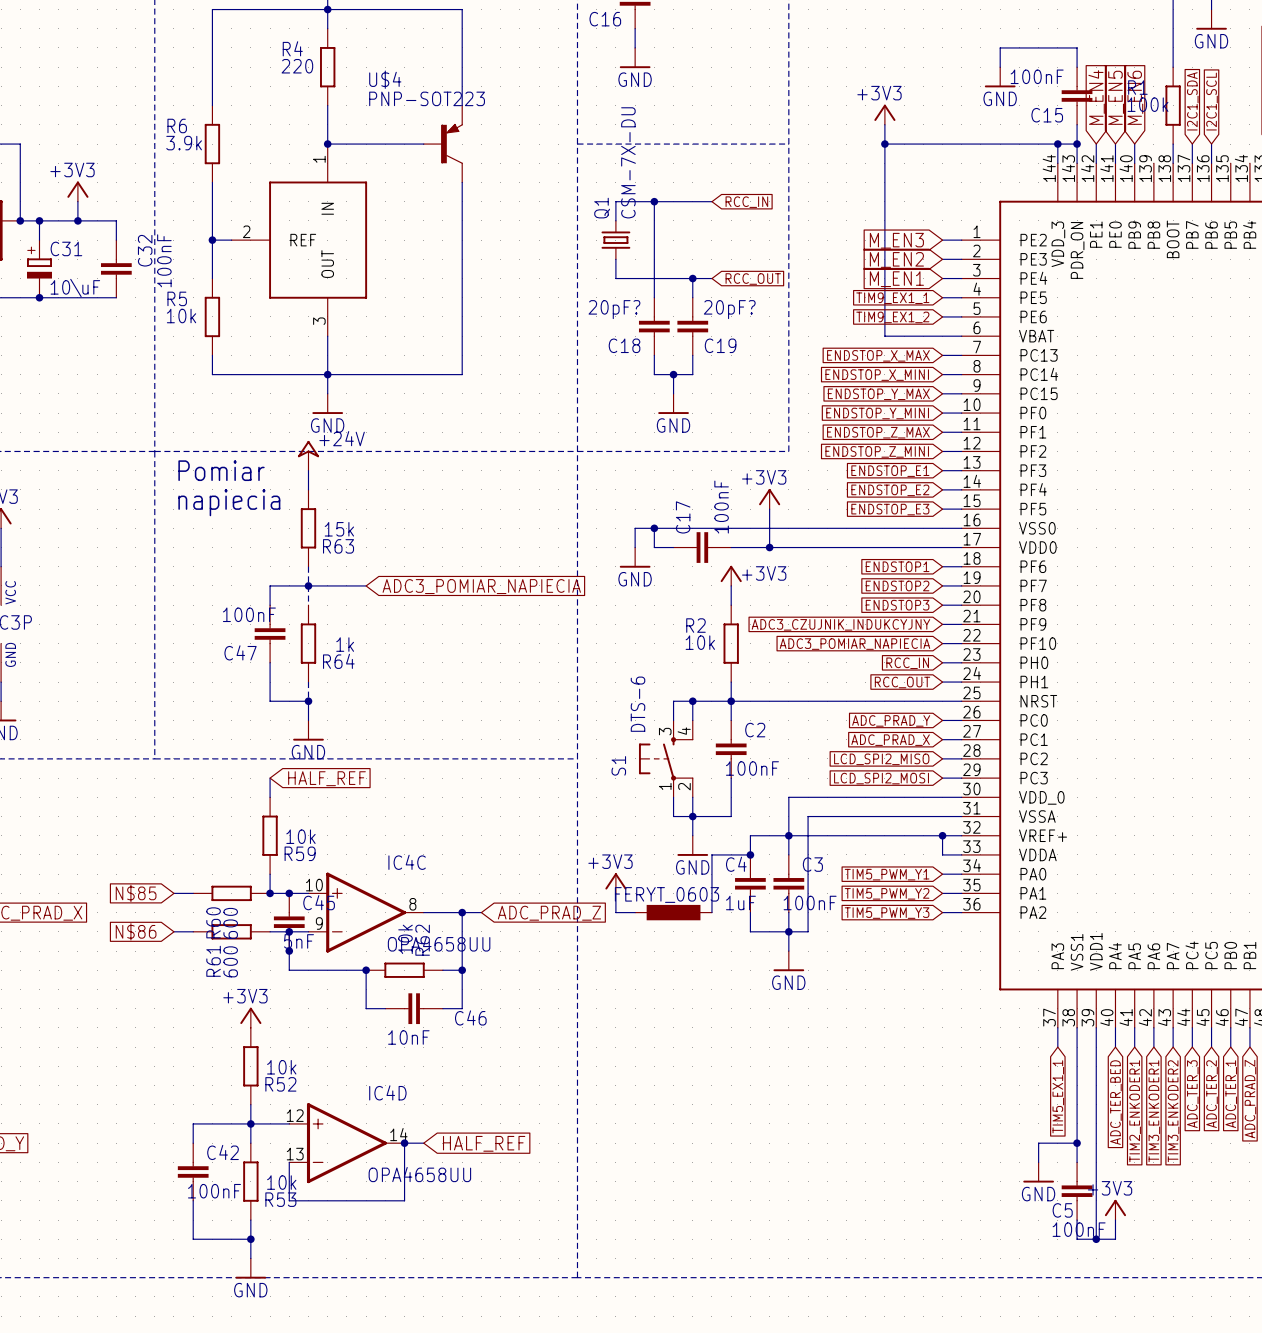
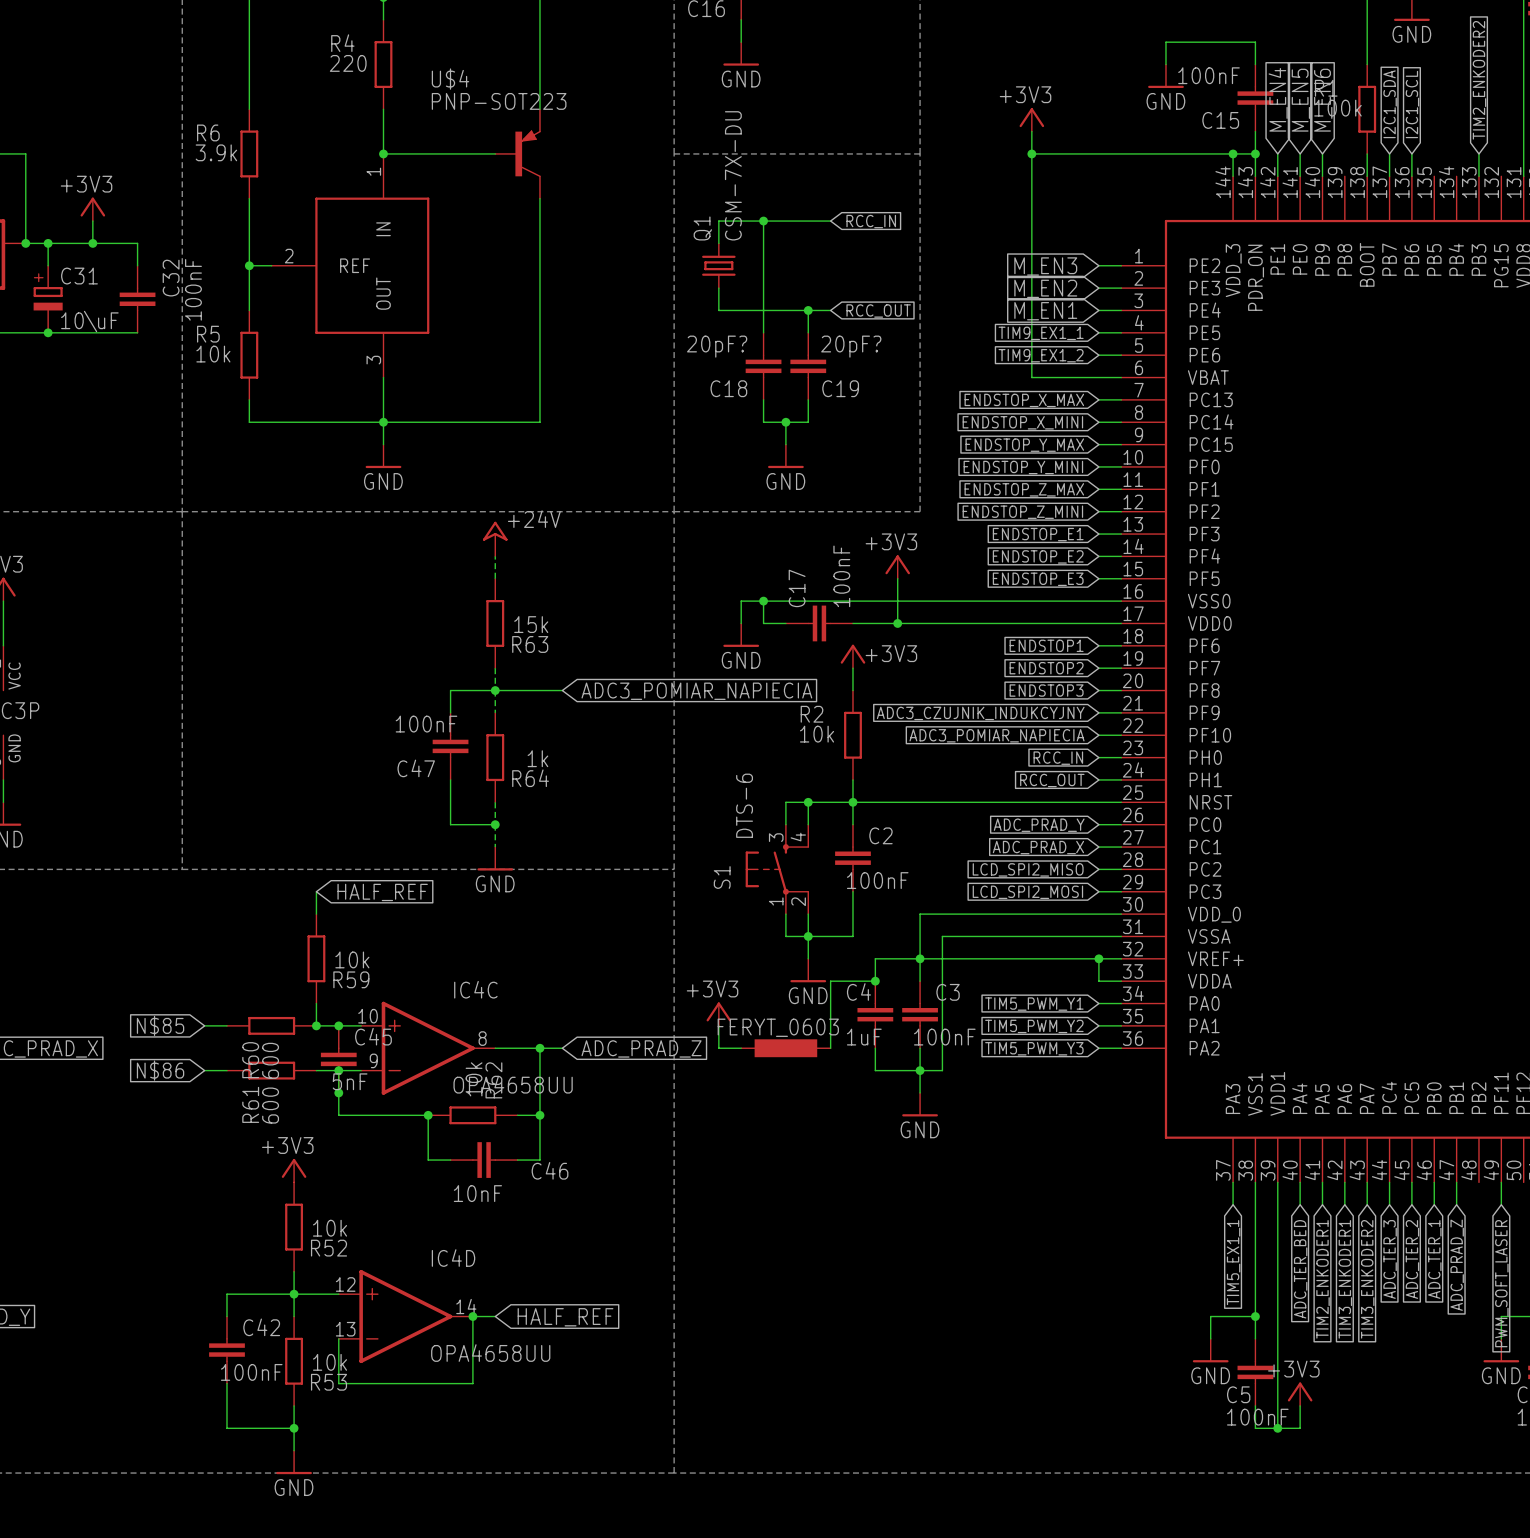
power symbol position: +24V (308, 455) -> +24V (495, 539)
text: Pomiar (221, 470) -> none
wire: (308, 470) (308, 489) -> (495, 556) (495, 578)
text: napiecia (229, 502) -> none
R63 position: (308, 528) -> (495, 623)
wire: (308, 566) (308, 605) -> (495, 668) (495, 712)
junction: (308, 585) -> none
wire: (366, 585) (270, 585) (270, 605) -> (562, 690) (450, 690) (450, 712)
global label position: ADC3_POMIAR_NAPIECIA (481, 586) -> ADC3_POMIAR_NAPIECIA (696, 691)
junction: none -> (495, 690)
C47 position: (270, 634) -> (450, 746)
R64 position: (308, 643) -> (495, 757)
wire: (270, 662) (270, 701) (308, 701) -> (450, 779) (450, 824) (495, 824)
wire: (308, 682) (308, 701) -> none
wire: (308, 701) (308, 720) -> none
junction: (308, 701) -> none
wire: none -> (495, 802) (495, 847)
junction: none -> (495, 824)
power symbol position: GND (308, 730) -> GND (495, 858)

